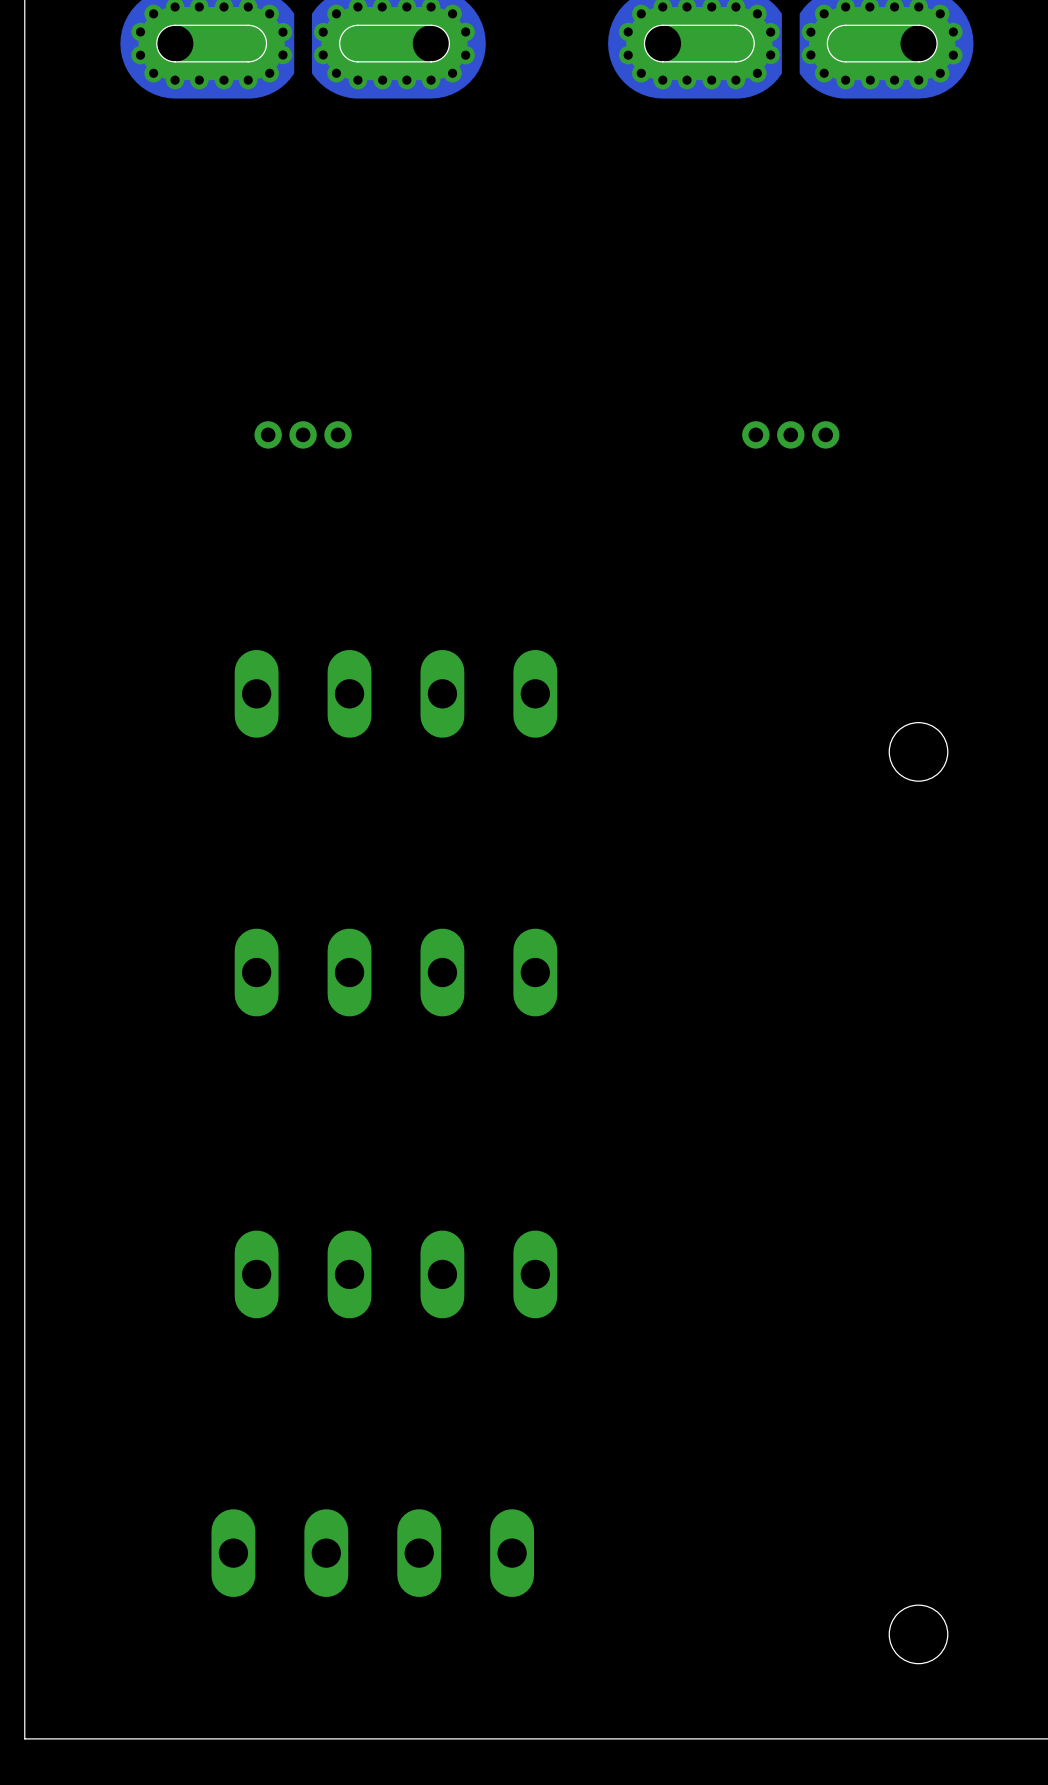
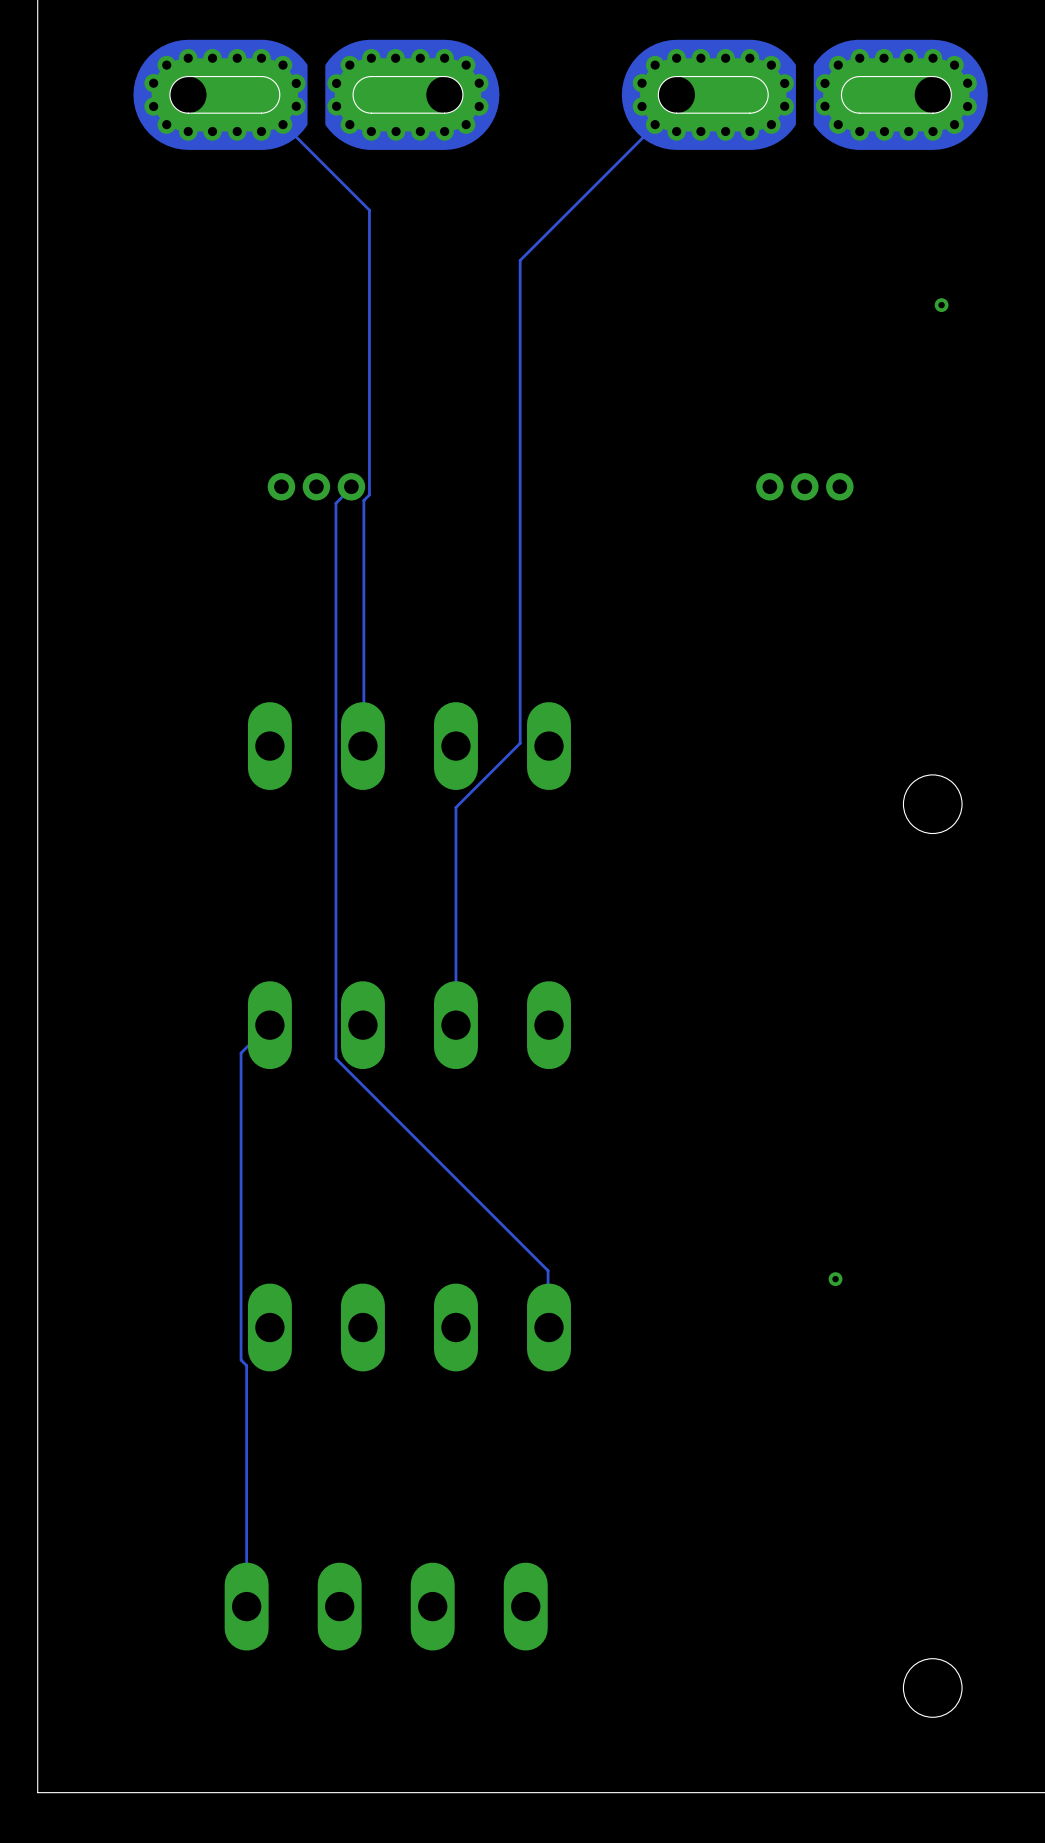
track: none -> (283, 124) (369, 210) (369, 494) (363, 500) (362, 746)
track: none -> (655, 124) (520, 260) (520, 743) (455, 807) (455, 1025)
via: none -> (941, 305)
track: none -> (351, 486) (335, 503) (335, 1058) (548, 1270) (549, 1327)
track: none -> (269, 1025) (241, 1053) (241, 1360) (246, 1365) (246, 1606)
via: none -> (835, 1279)

